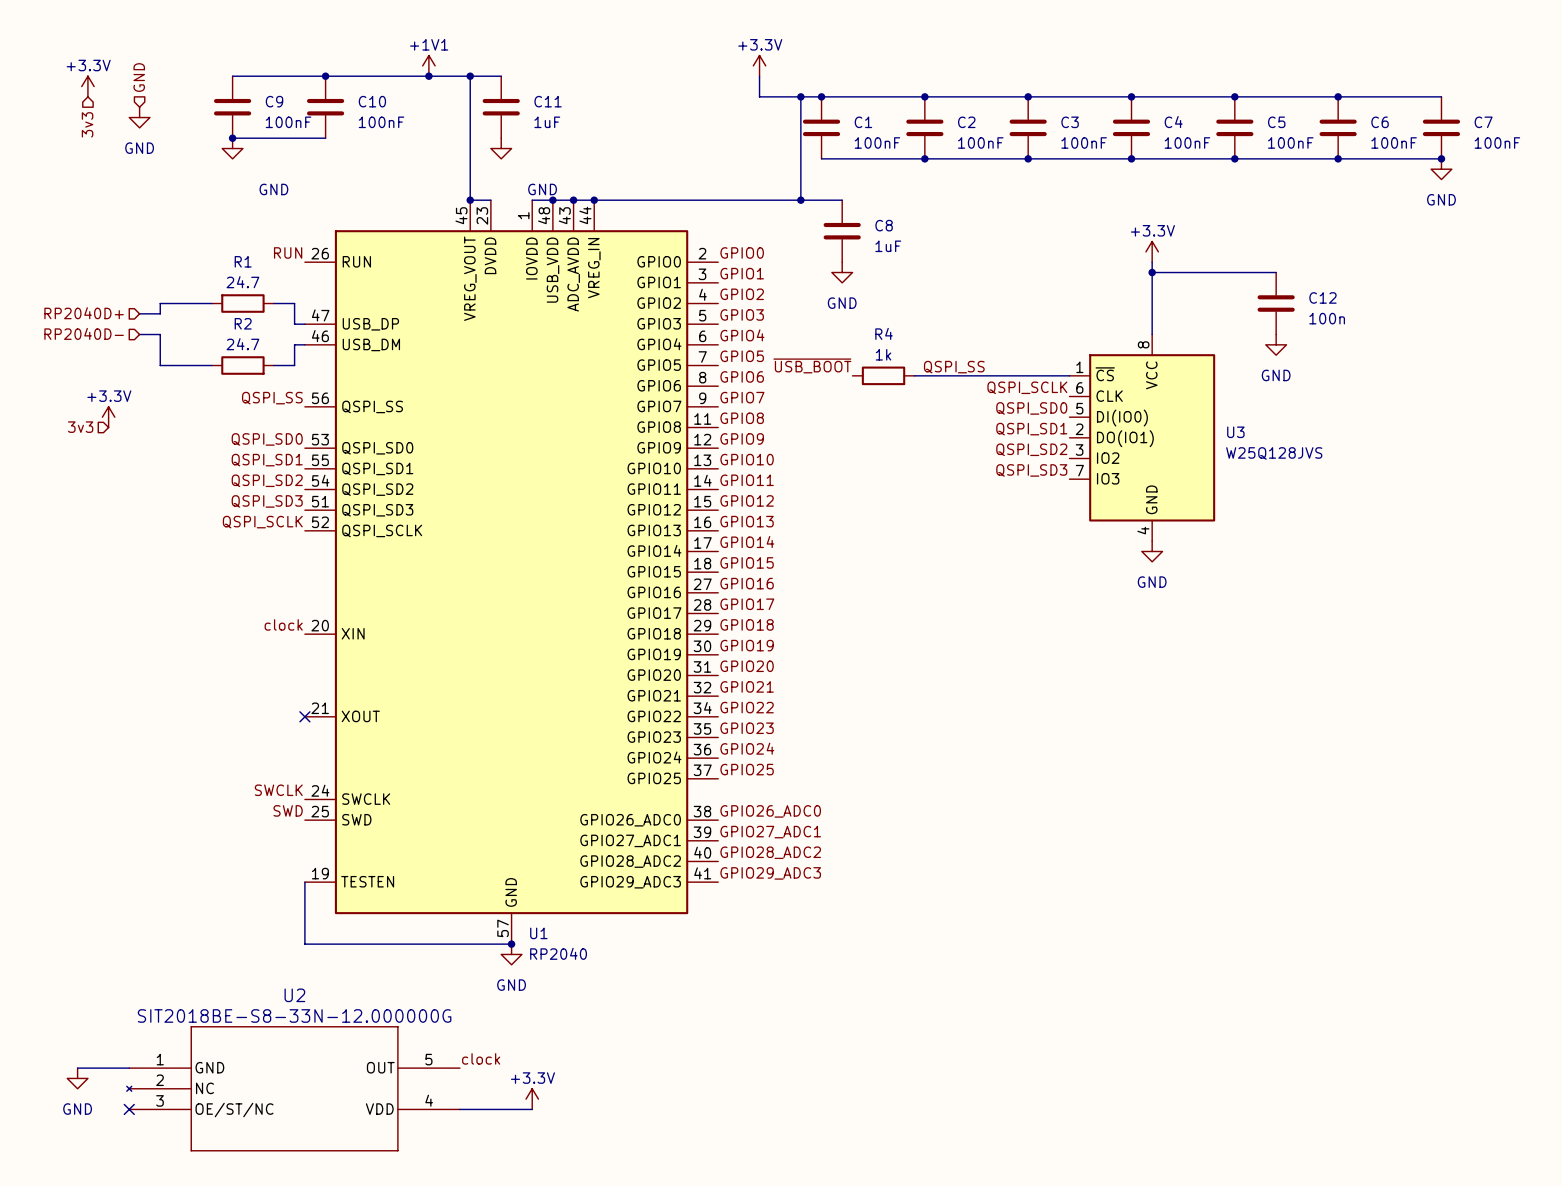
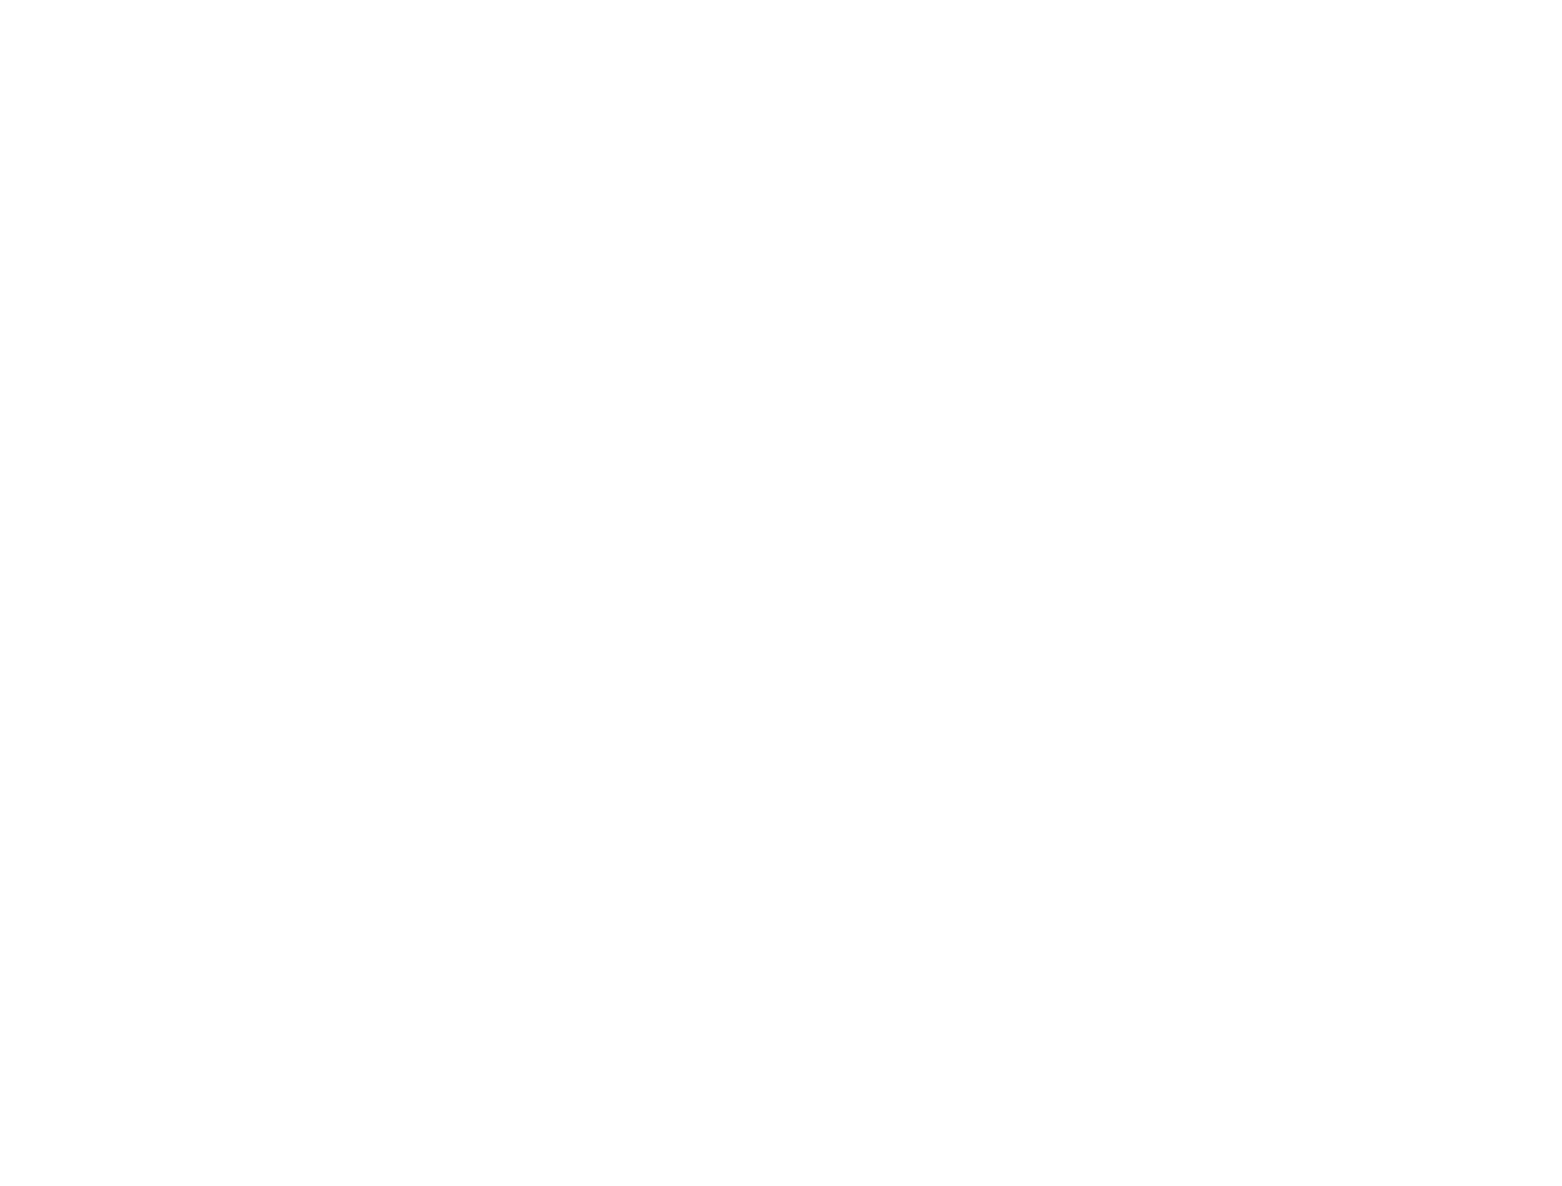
power symbol: +1V1 (428, 65) -> none
power symbol: +3.3V (759, 65) -> none
wire: (232, 76) (501, 76) -> none
junction: (325, 76) -> none
junction: (428, 76) -> none
wire: (470, 76) (470, 200) (490, 200) -> none
junction: (470, 76) -> none
wire: (759, 76) (759, 96) (1441, 96) -> none
hierarchical label: GND (139, 77) -> none
power symbol: +3.3V (87, 86) -> none
wire: (800, 96) (800, 200) -> none
junction: (800, 96) -> none
junction: (821, 96) -> none
junction: (924, 96) -> none
junction: (1028, 96) -> none
junction: (1131, 96) -> none
junction: (1234, 96) -> none
junction: (1338, 96) -> none
C9: 100nF (232, 107) -> none
C10: 100nF (325, 107) -> none
C11: 1uF (501, 107) -> none
power symbol: GND (139, 117) -> none
hierarchical label: 3v3 (87, 124) -> none
C1: 100nF (821, 127) -> none
C2: 100nF (924, 127) -> none
C3: 100nF (1028, 127) -> none
C4: 100nF (1131, 127) -> none
C5: 100nF (1234, 127) -> none
C6: 100nF (1338, 127) -> none
C7: 100nF (1441, 127) -> none
wire: (232, 138) (325, 138) -> none
junction: (232, 138) -> none
power symbol: GND (232, 148) -> none
power symbol: GND (501, 148) -> none
wire: (821, 158) (1441, 158) -> none
junction: (924, 158) -> none
junction: (1028, 158) -> none
junction: (1131, 158) -> none
junction: (1234, 158) -> none
junction: (1338, 158) -> none
junction: (1441, 158) -> none
power symbol: GND (1441, 169) -> none
junction: (470, 200) -> none
wire: (532, 200) (842, 200) -> none
junction: (552, 200) -> none
junction: (573, 200) -> none
junction: (594, 200) -> none
junction: (800, 200) -> none
C8: 1uF (842, 231) -> none
power symbol: +3.3V (1152, 251) -> none
label: RUN (288, 252) -> none
label: GPIO0 (742, 252) -> none
wire: (1152, 262) (1152, 334) -> none
power symbol: GND (842, 272) -> none
wire: (1152, 272) (1276, 272) -> none
junction: (1152, 272) -> none
label: GPIO1 (742, 273) -> none
label: GPIO2 (742, 294) -> none
wire: (211, 303) (160, 303) (160, 313) (139, 313) -> none
R1: 24.7 (242, 303) -> none
wire: (273, 303) (294, 303) (294, 324) (304, 324) -> none
C12: 100n (1276, 303) -> none
hierarchical label: RP2040D+ (84, 313) -> none
label: GPIO3 (742, 314) -> none
hierarchical label: RP2040D- (84, 333) -> none
wire: (139, 334) (160, 334) (160, 365) (211, 365) -> none
label: GPIO4 (742, 335) -> none
wire: (304, 344) (294, 344) (294, 365) (273, 365) -> none
power symbol: GND (1276, 344) -> none
label: GPIO5 (742, 356) -> none
R2: 24.7 (242, 365) -> none
label: ~{USB_BOOT} (812, 365) -> none
label: QSPI_SS (954, 367) -> none
R4: 1k (883, 375) -> none
wire: (914, 375) (1069, 375) -> none
label: GPIO6 (742, 376) -> none
label: QSPI_SCLK (1027, 387) -> none
label: GPIO7 (742, 397) -> none
label: QSPI_SS (272, 398) -> none
label: QSPI_SD0 (1031, 408) -> none
power symbol: +3.3V (108, 417) -> none
label: GPIO8 (742, 418) -> none
hierarchical label: 3v3 (80, 427) -> none
label: QSPI_SD1 (1031, 429) -> none
U3: W25Q128JVS (1142, 437) -> none
label: GPIO9 (742, 438) -> none
label: QSPI_SD0 (267, 439) -> none
label: QSPI_SD2 (1031, 449) -> none
label: GPIO10 (747, 459) -> none
label: QSPI_SD1 (267, 460) -> none
label: QSPI_SD3 (1031, 470) -> none
label: QSPI_SD2 (267, 480) -> none
label: GPIO11 (747, 480) -> none
label: GPIO12 (747, 500) -> none
label: QSPI_SD3 (267, 501) -> none
label: GPIO13 (747, 521) -> none
label: QSPI_SCLK (262, 522) -> none
label: GPIO14 (747, 542) -> none
power symbol: GND (1152, 551) -> none
label: GPIO15 (747, 562) -> none
U1: RP2040 (511, 572) -> none
label: GPIO16 (747, 583) -> none
label: GPIO17 (747, 604) -> none
label: clock (283, 624) -> none
label: GPIO18 (747, 624) -> none
label: GPIO19 (747, 645) -> none
label: GPIO20 (747, 666) -> none
label: GPIO21 (747, 686) -> none
label: GPIO22 (747, 707) -> none
no-connect mark: (304, 716) -> none
label: GPIO23 (747, 728) -> none
label: GPIO24 (747, 748) -> none
label: GPIO25 (747, 769) -> none
label: SWCLK (278, 790) -> none
label: SWD (288, 810) -> none
label: GPIO26_ADC0 (770, 811) -> none
label: GPIO27_ADC1 (770, 832) -> none
label: GPIO28_ADC2 (770, 852) -> none
label: GPIO29_ADC3 (770, 873) -> none
wire: (304, 882) (304, 944) (511, 944) -> none
junction: (511, 944) -> none
power symbol: GND (511, 954) -> none
label: clock (481, 1058) -> none
wire: (77, 1068) (129, 1068) -> none
power symbol: GND (77, 1078) -> none
U2: SIT2018BE-S8-33N-12.000000G (293, 1088) -> none
power symbol: +3.3V (532, 1099) -> none
no-connect mark: (129, 1109) -> none
wire: (459, 1109) (532, 1109) -> none

